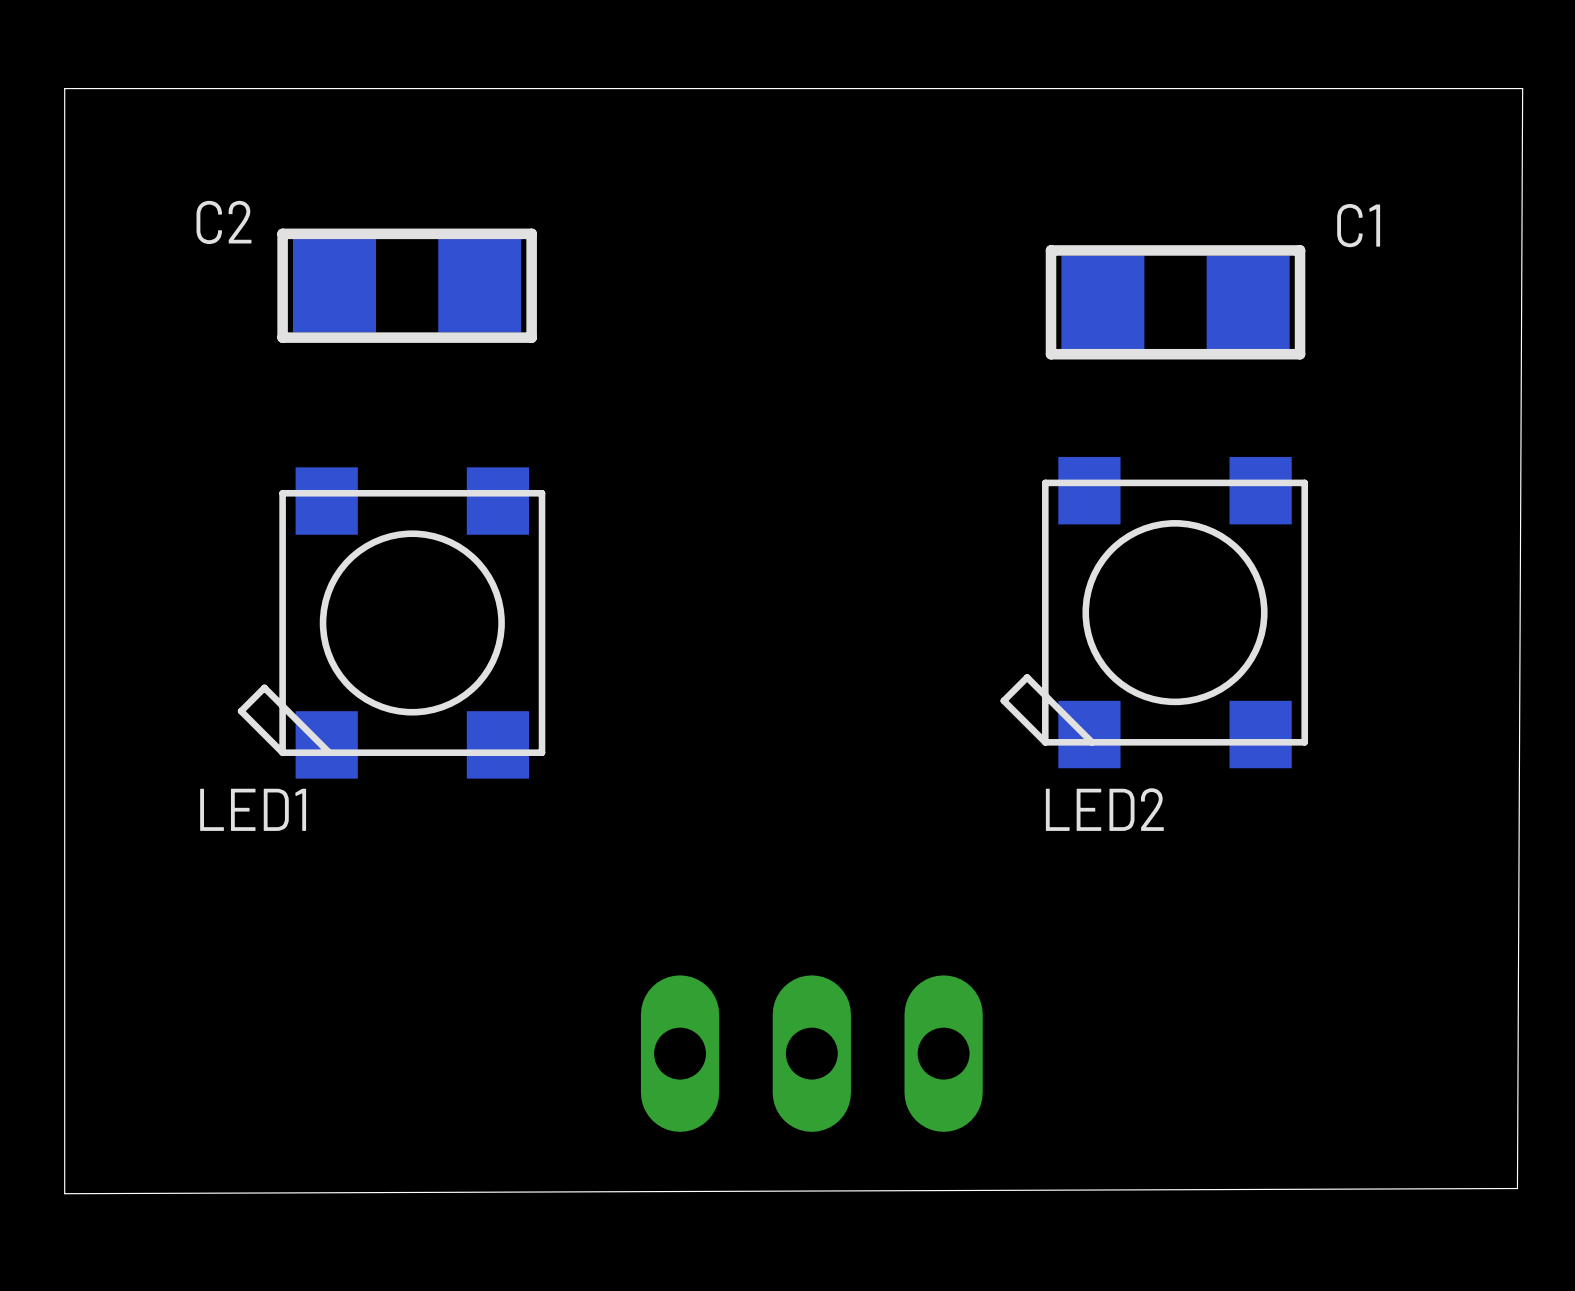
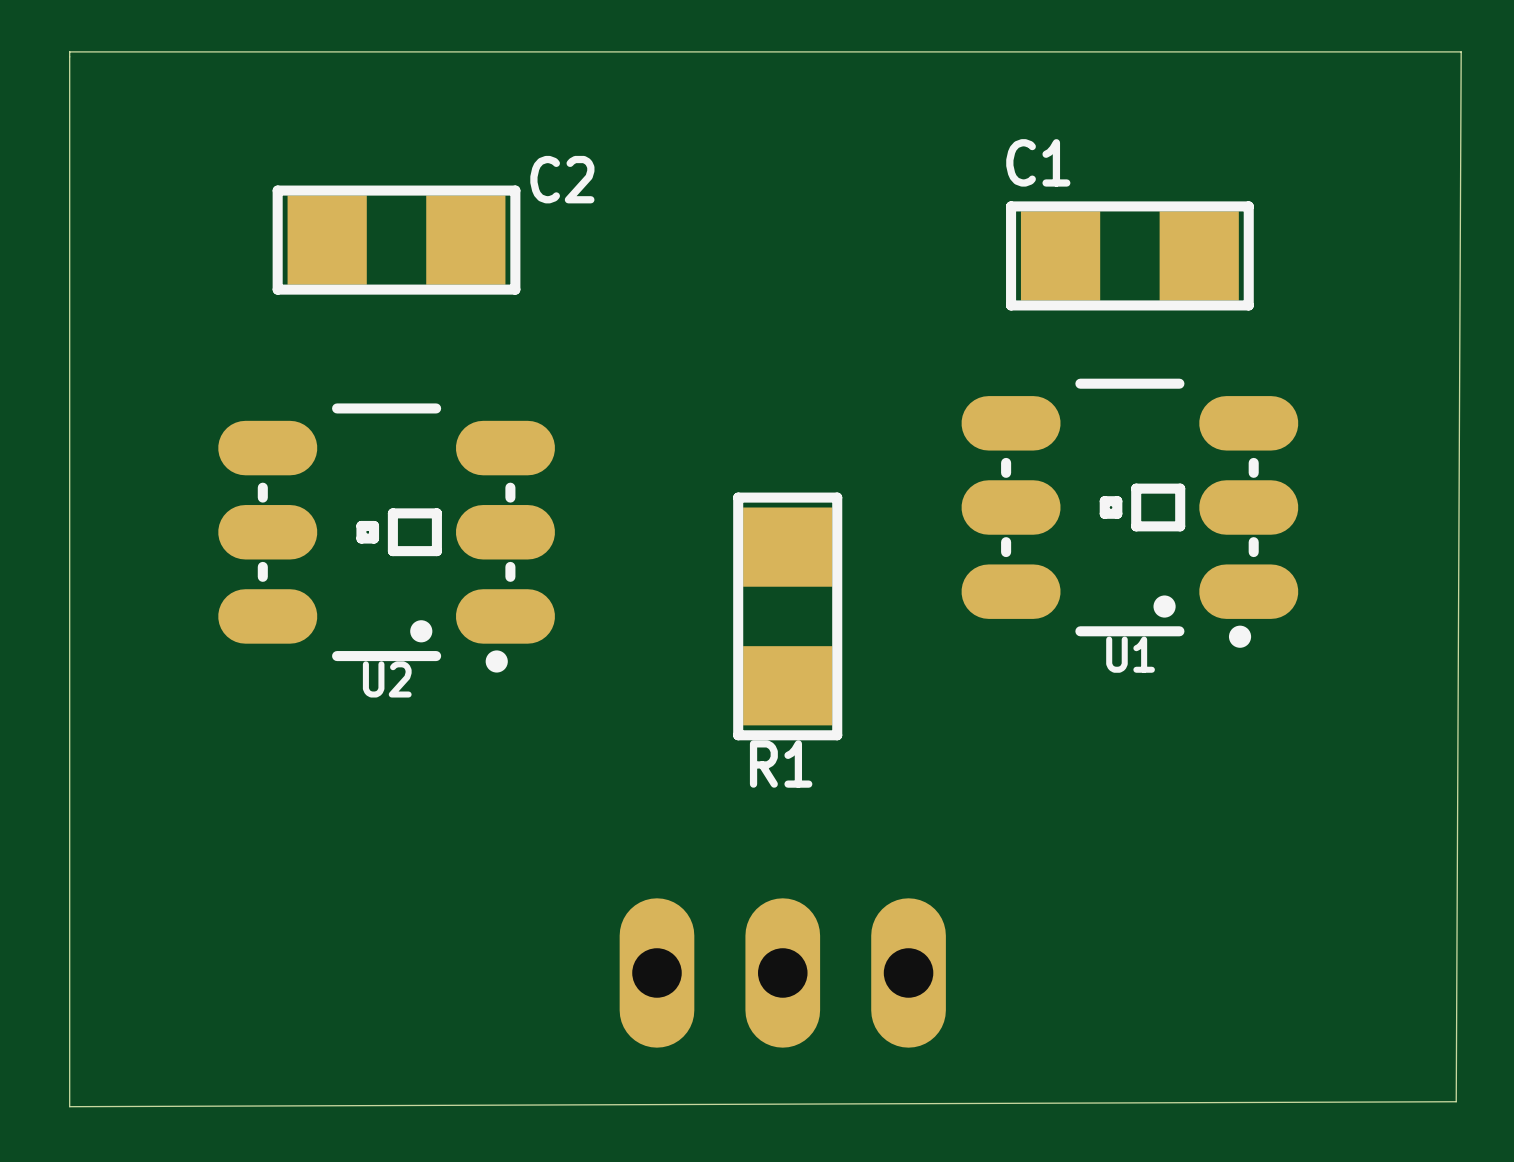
C2 name position: C2 (223, 222) -> C2 (562, 179)
C1 name position: C1 (1358, 225) -> C1 (1038, 162)
U1: none -> (1129, 513)
U2: none -> (386, 537)
LED2: (1154, 612) -> none
LED1: (391, 622) -> none
R1: none -> (787, 616)

